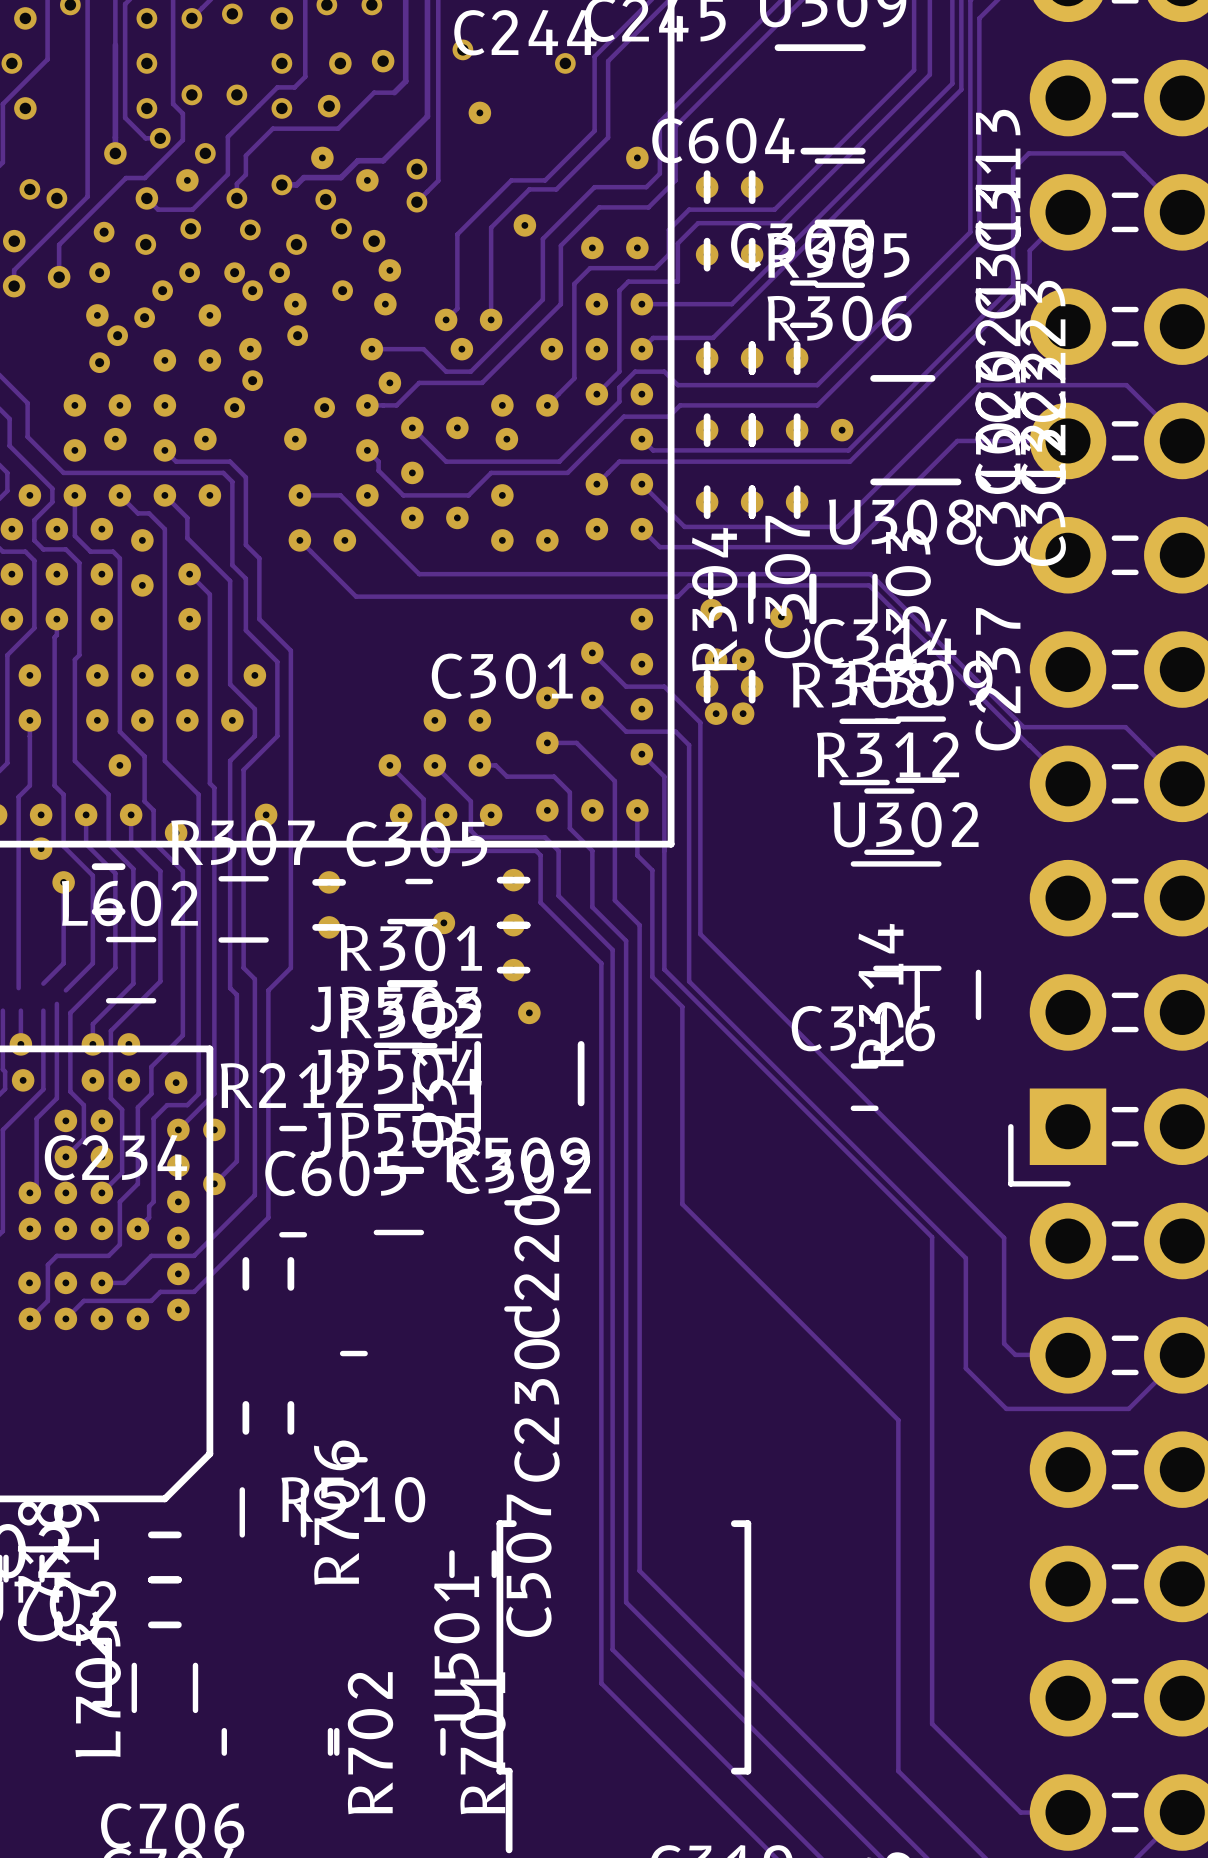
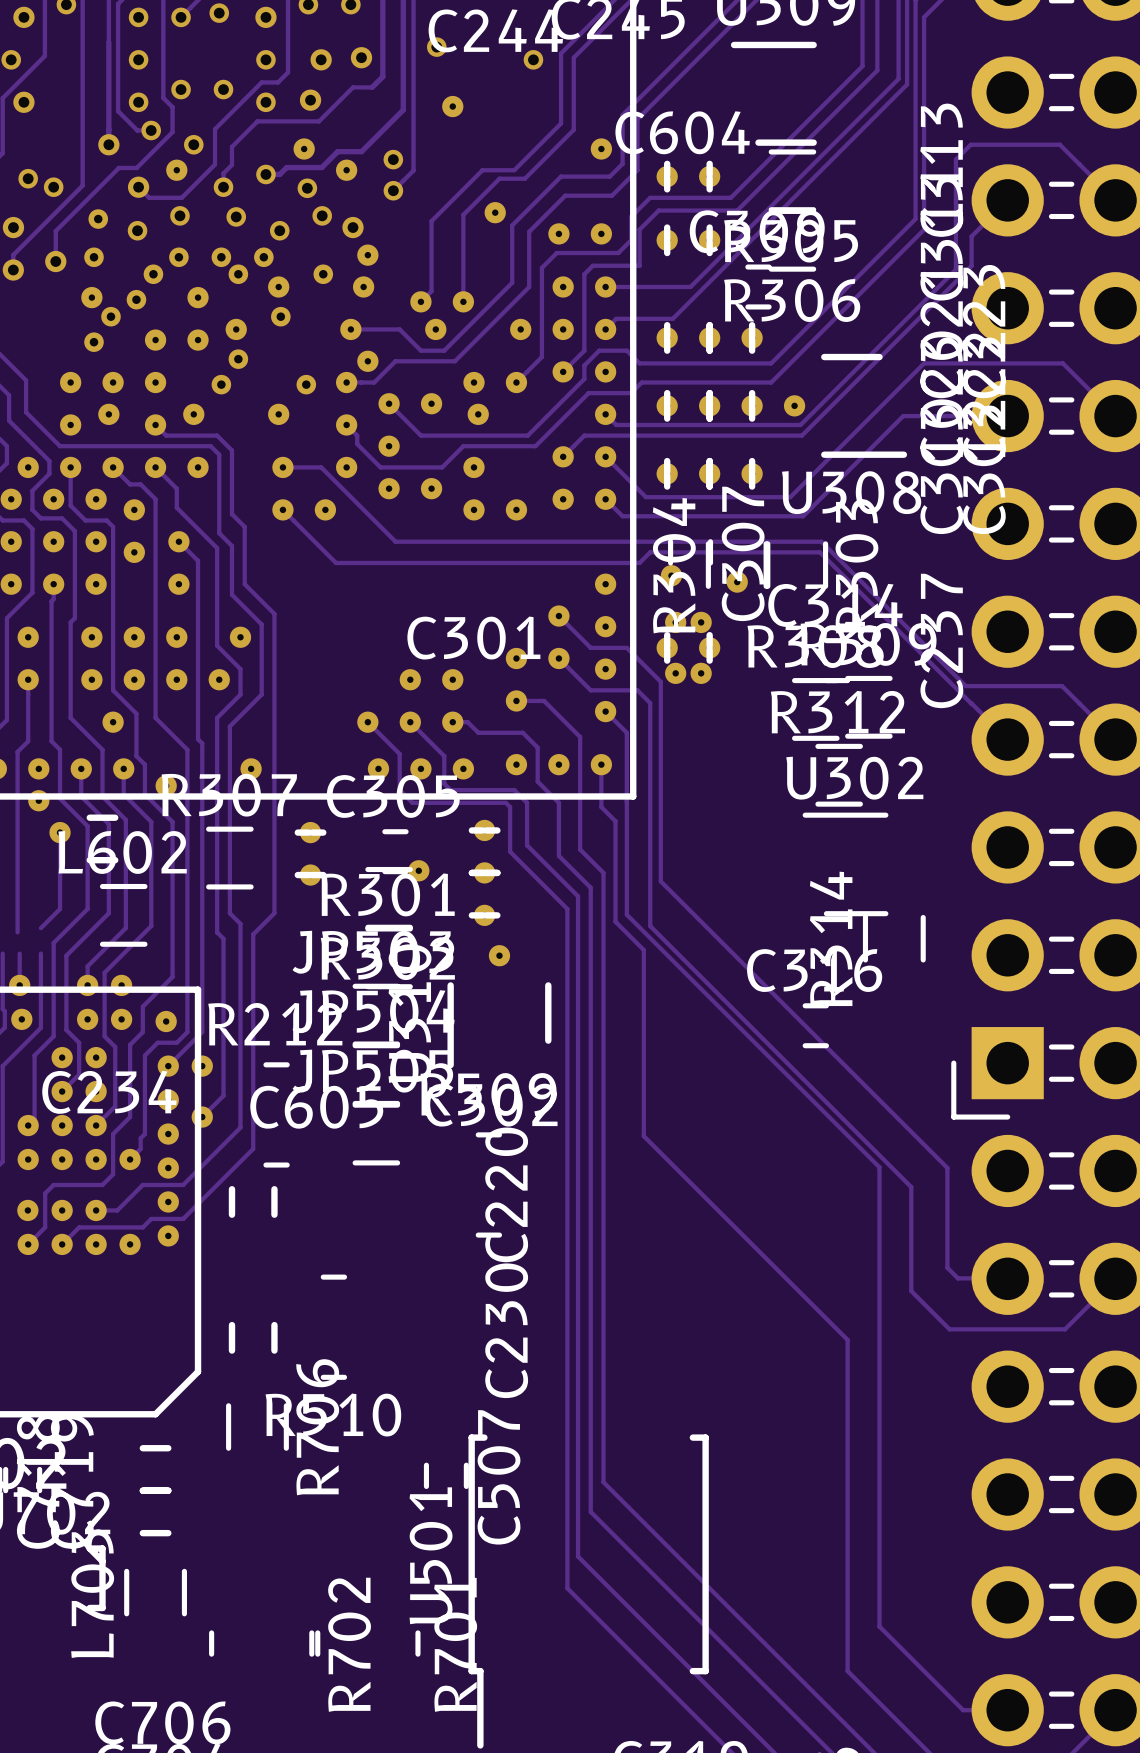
track: none -> (62, 934) (53, 942) (53, 947)

